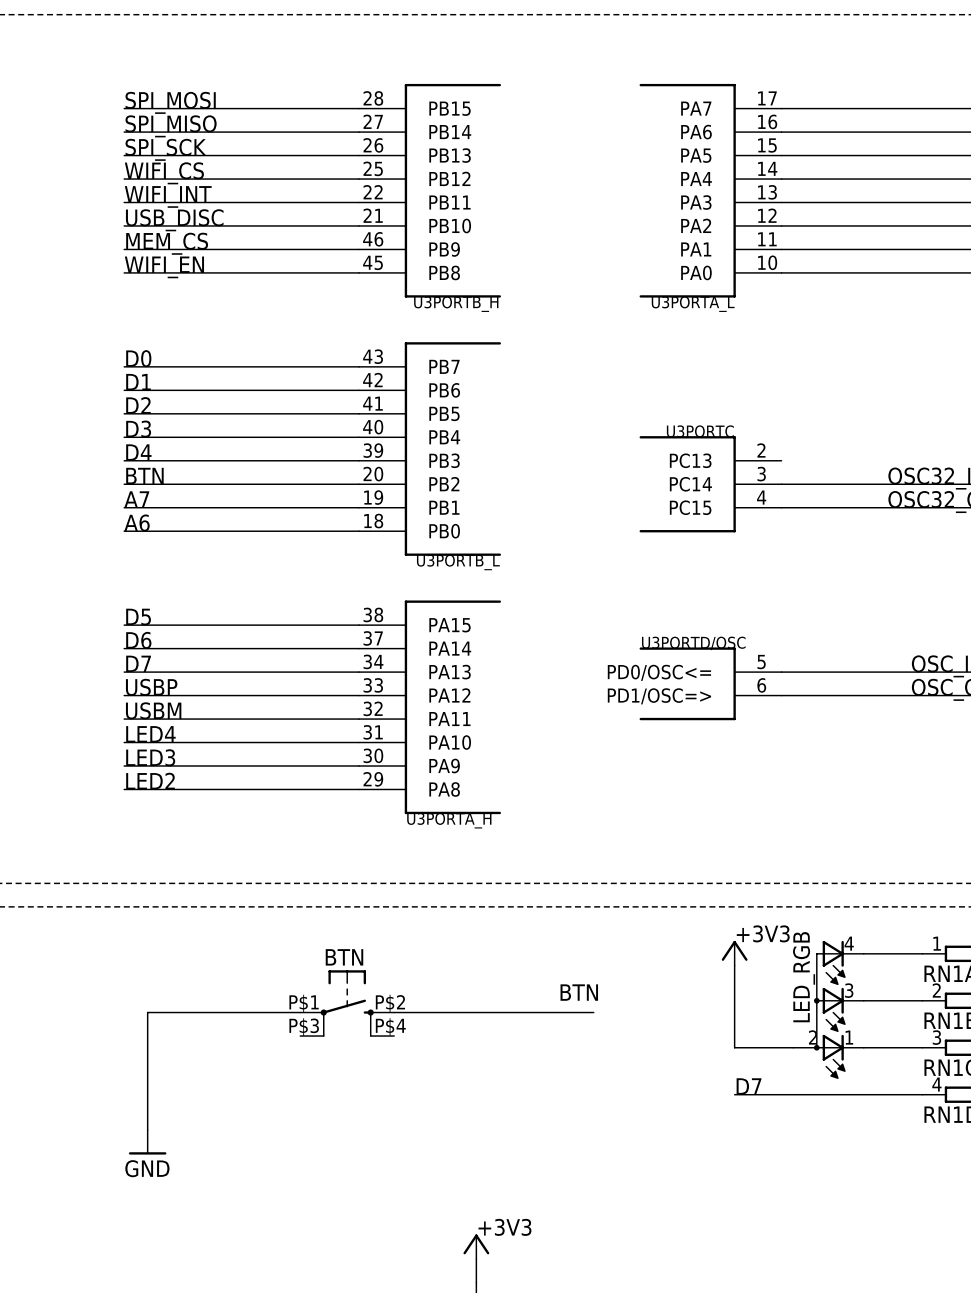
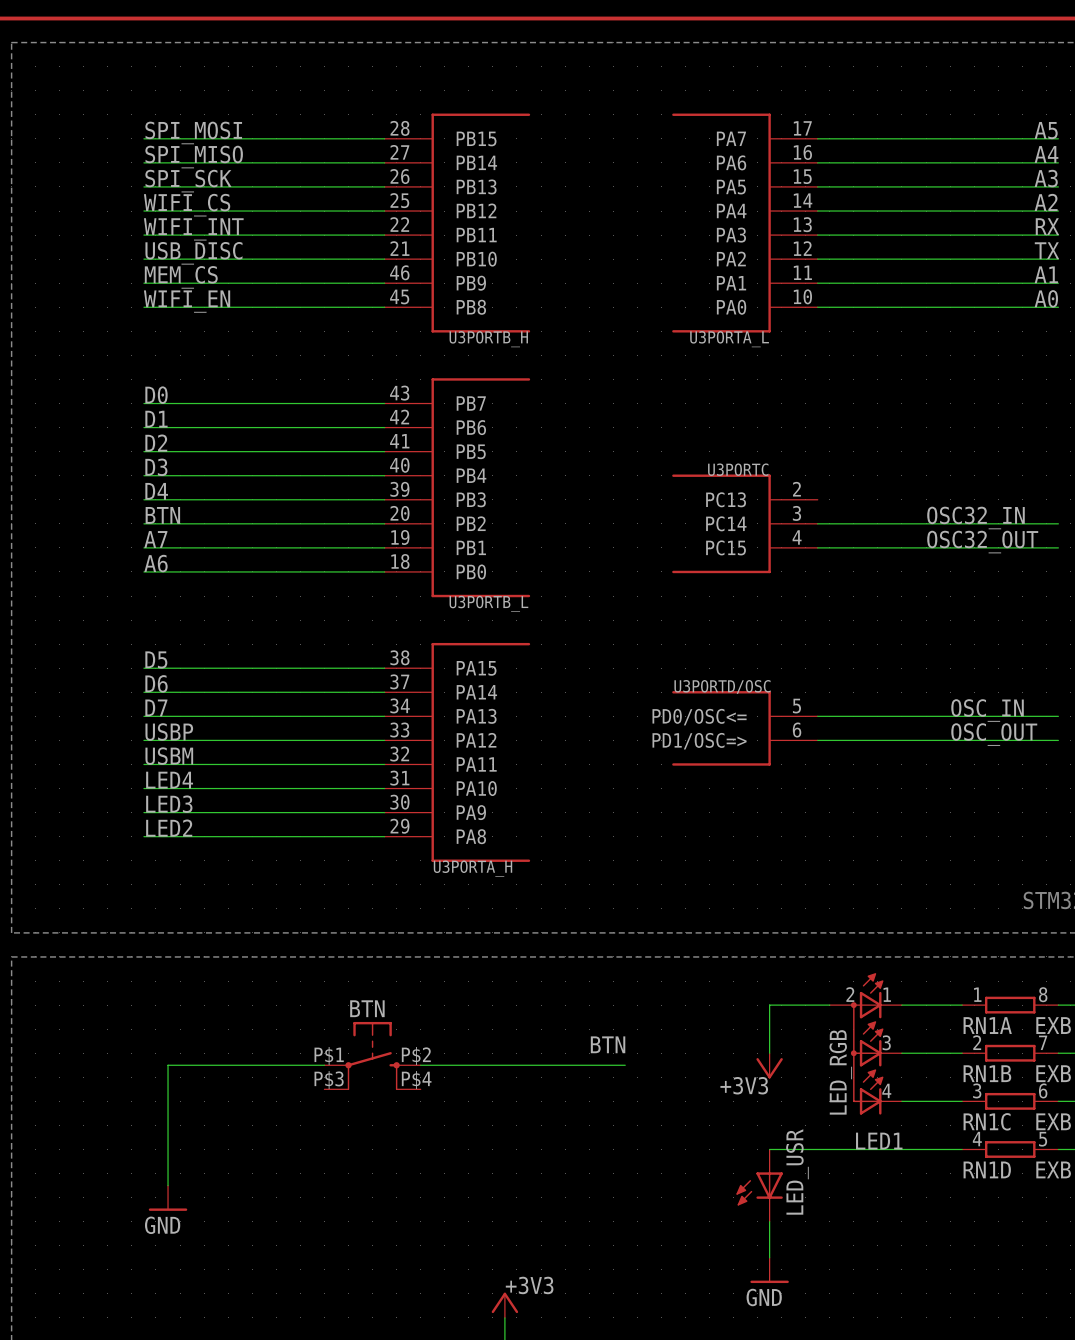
power symbol rotation: 0° (734, 950) -> 180° (769, 1068)
power symbol position: +3V3 (734, 953) -> +3V3 (769, 1065)
wire: none -> (829, 1005) (769, 1005) (769, 1017)
LED_RGB: none -> (865, 1043)
wire: (734, 1000) (734, 1047) (793, 1047) -> none
LED_RGB: (828, 1009) -> none
label: D7 (749, 1086) -> none
label: none -> LED1 (879, 1141)
LED_USR: none -> (759, 1185)
wire: none -> (769, 1221) (769, 1257)
power symbol: none -> GND (769, 1270)

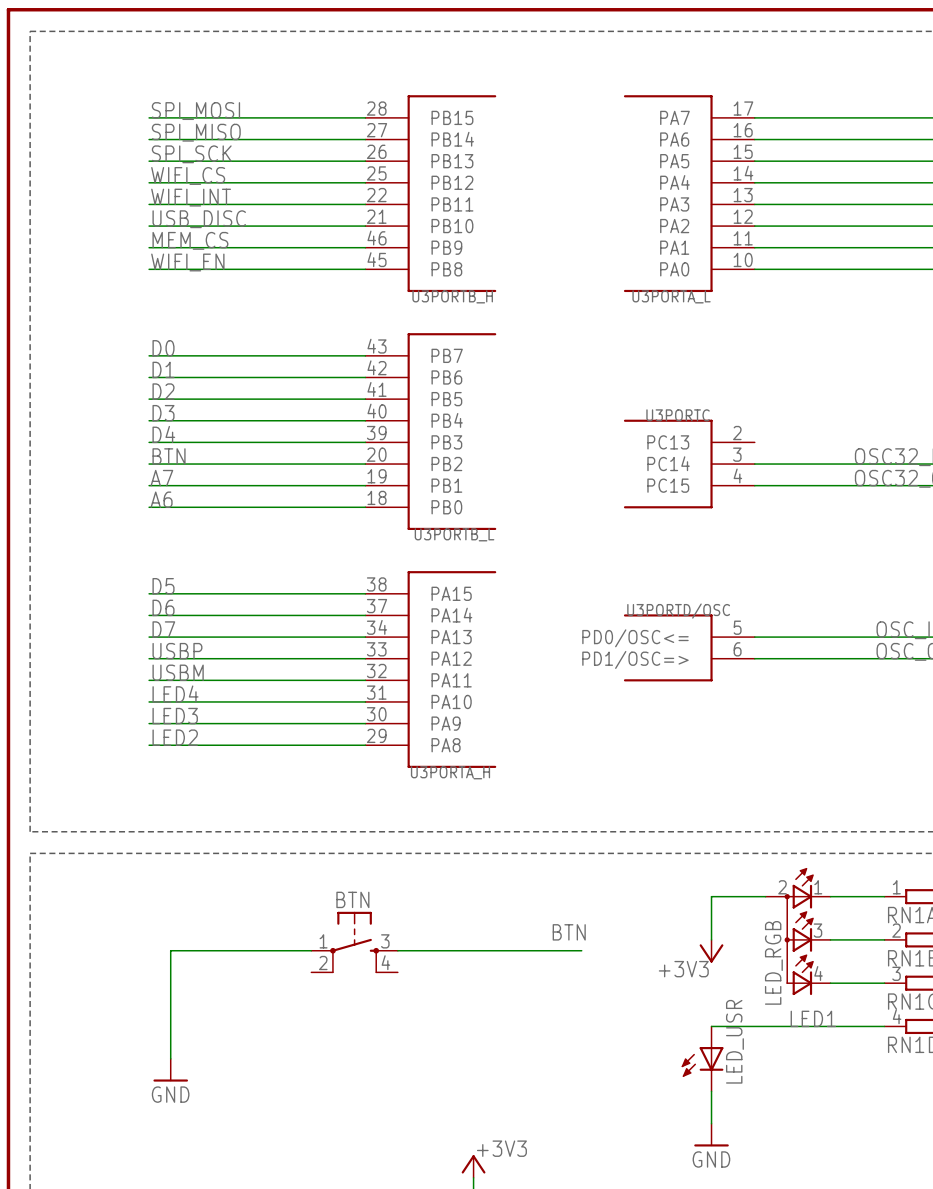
BTN pin number: P$1 (329, 1056) -> 1 (323, 941)
BTN pin number: P$2 (416, 1056) -> 3 (385, 941)
BTN pin number: P$3 (329, 1080) -> 2 (323, 963)
BTN pin number: P$4 (416, 1080) -> 4 (385, 962)

